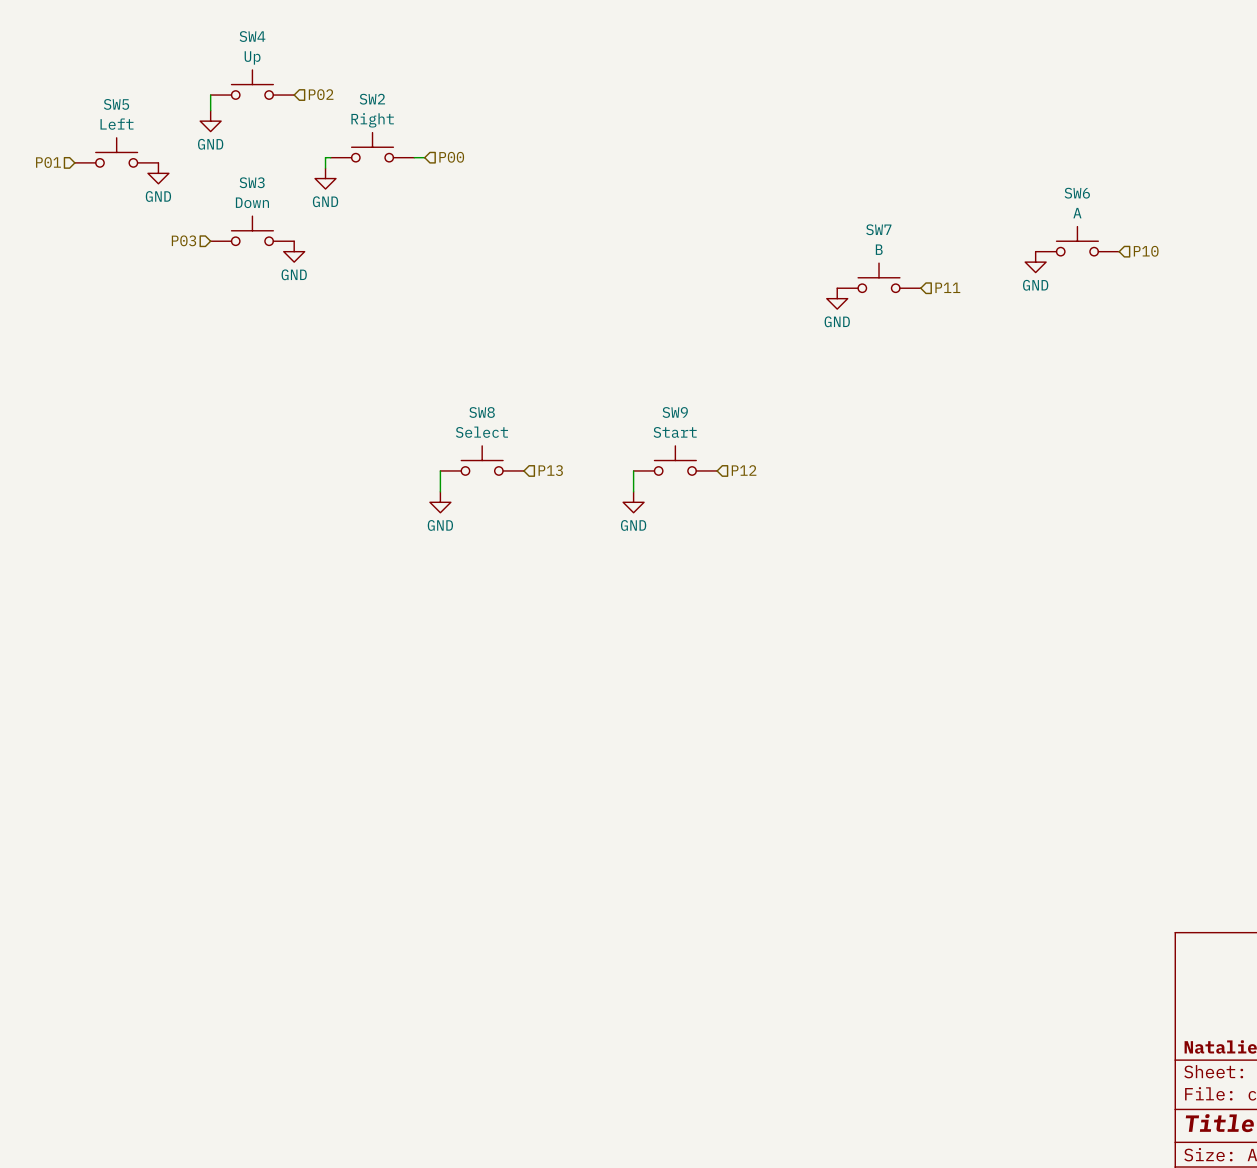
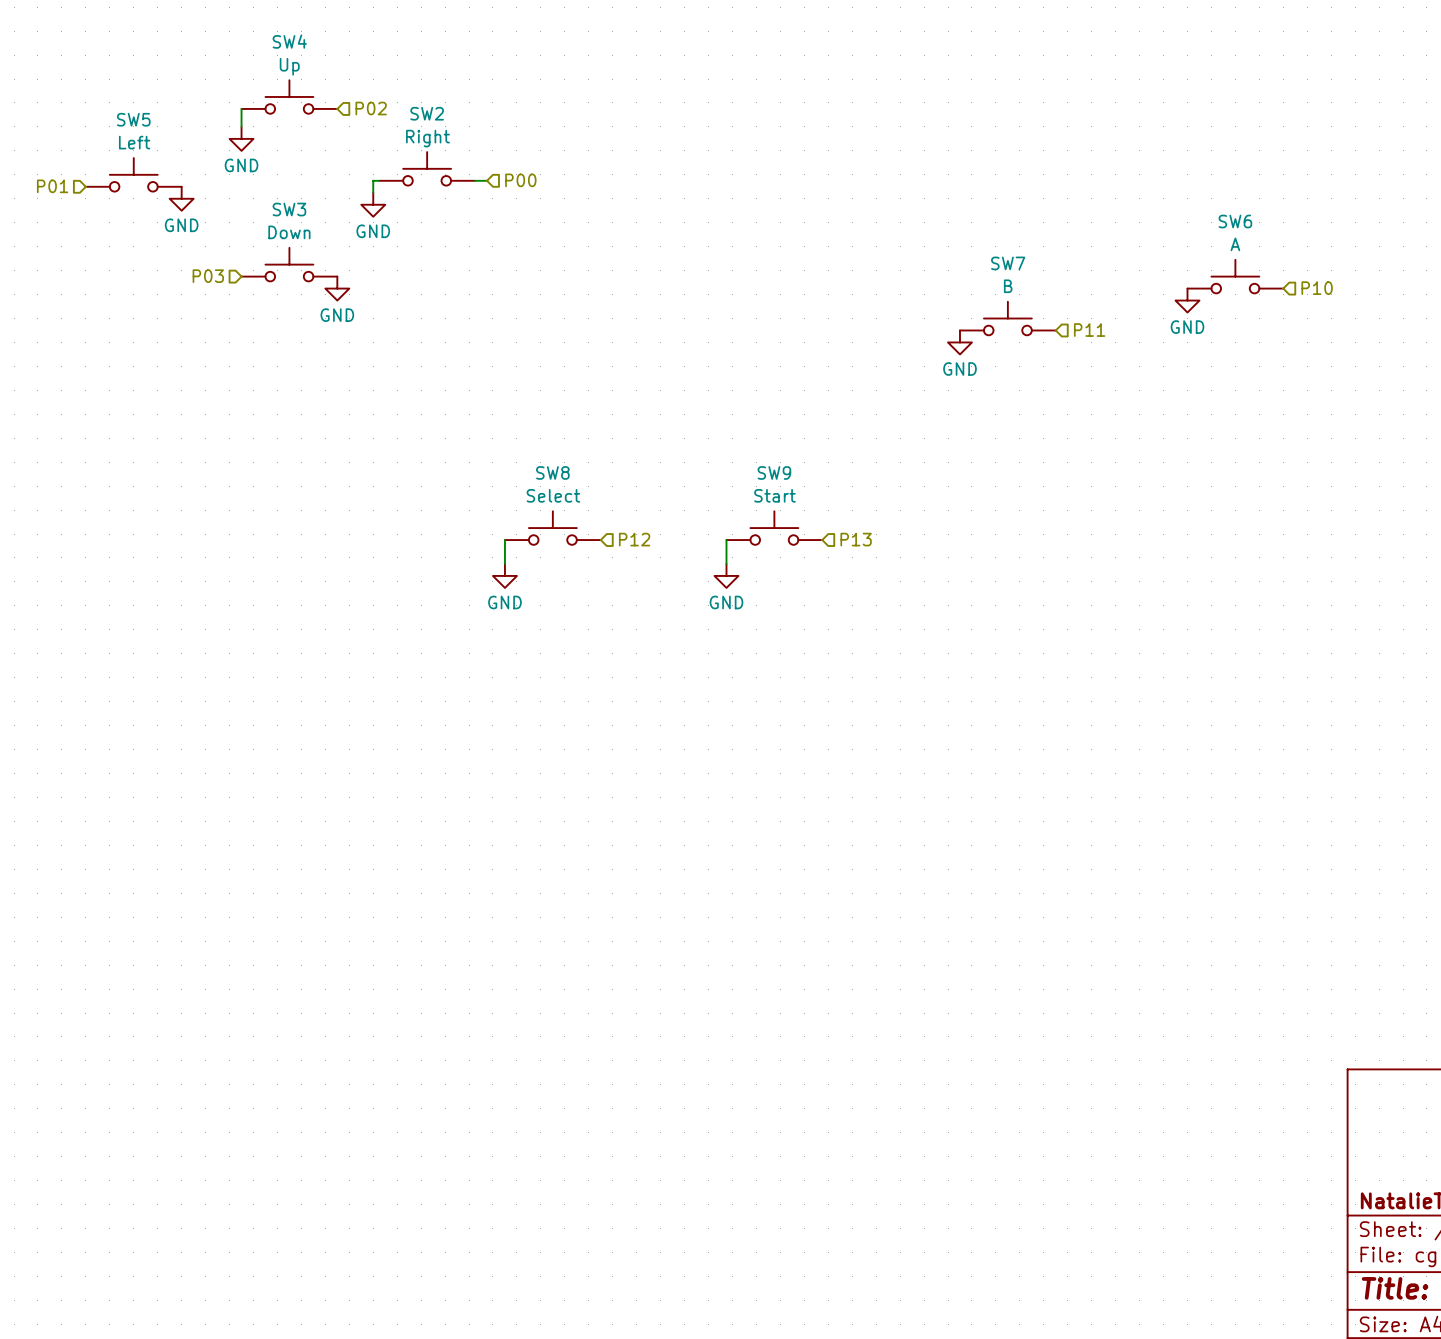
hierarchical label: P13 (550, 470) -> P12 (634, 539)
hierarchical label: P12 (744, 470) -> P13 (856, 539)

